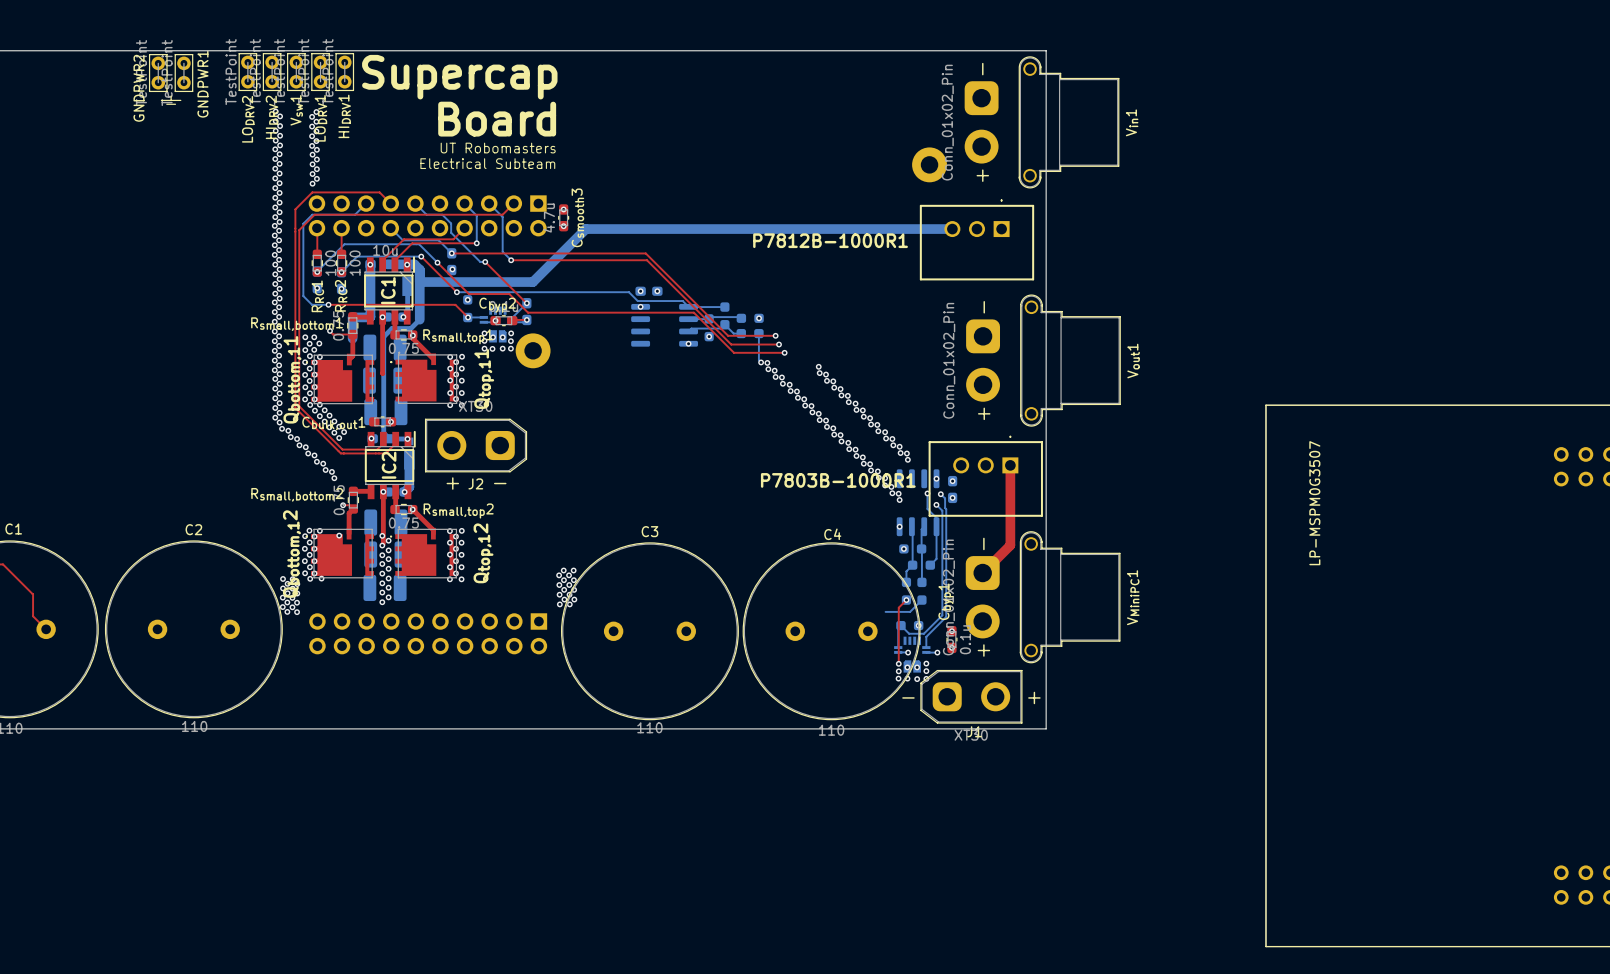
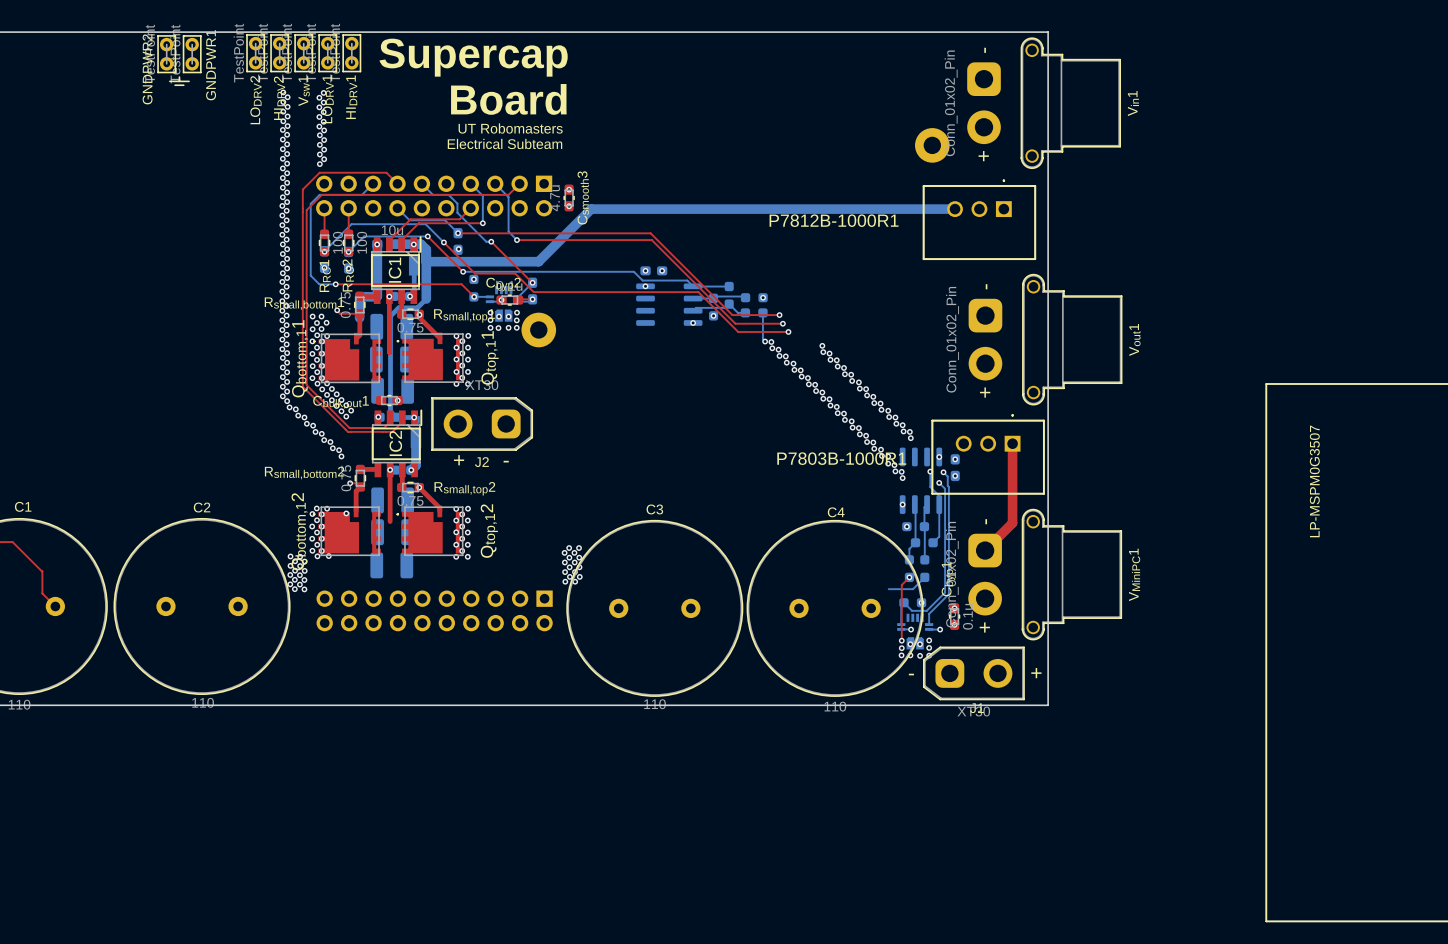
via: (382, 535) -> none
via: (388, 540) -> none
via: (382, 545) -> none
via: (388, 550) -> none
via: (382, 555) -> none
via: (388, 559) -> none
via: (382, 563) -> none
via: (388, 568) -> none
via: (382, 573) -> none
via: (388, 578) -> none
via: (382, 583) -> none
via: (388, 587) -> none
via: (382, 592) -> none
via: (388, 597) -> none
via: (382, 602) -> none

